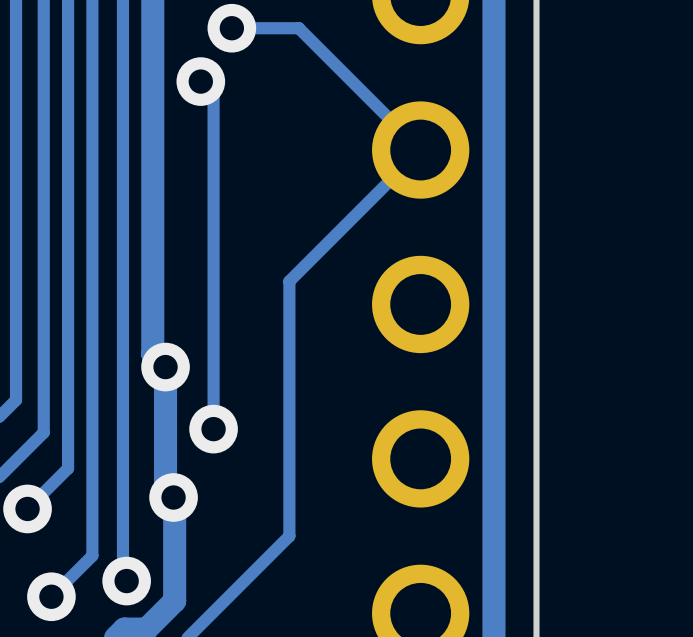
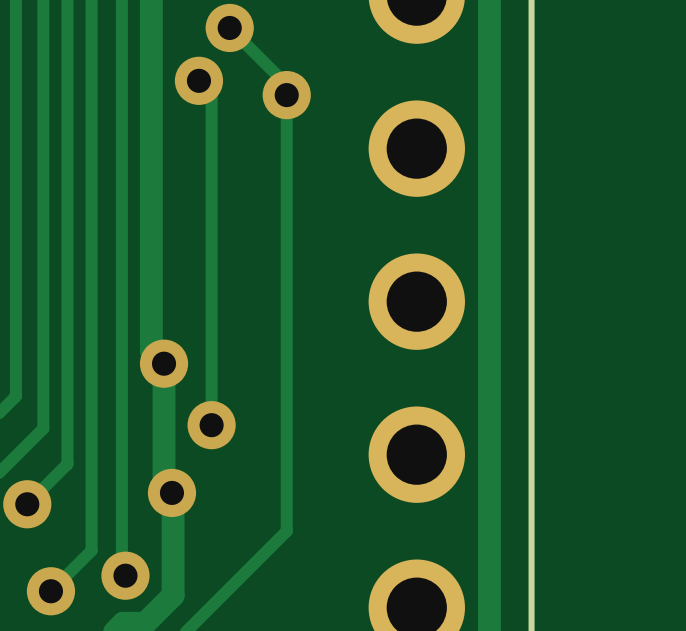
track: (231, 28) (298, 28) (420, 150) (289, 281) -> (229, 27) (286, 84) (286, 278)
via: none -> (286, 95)

